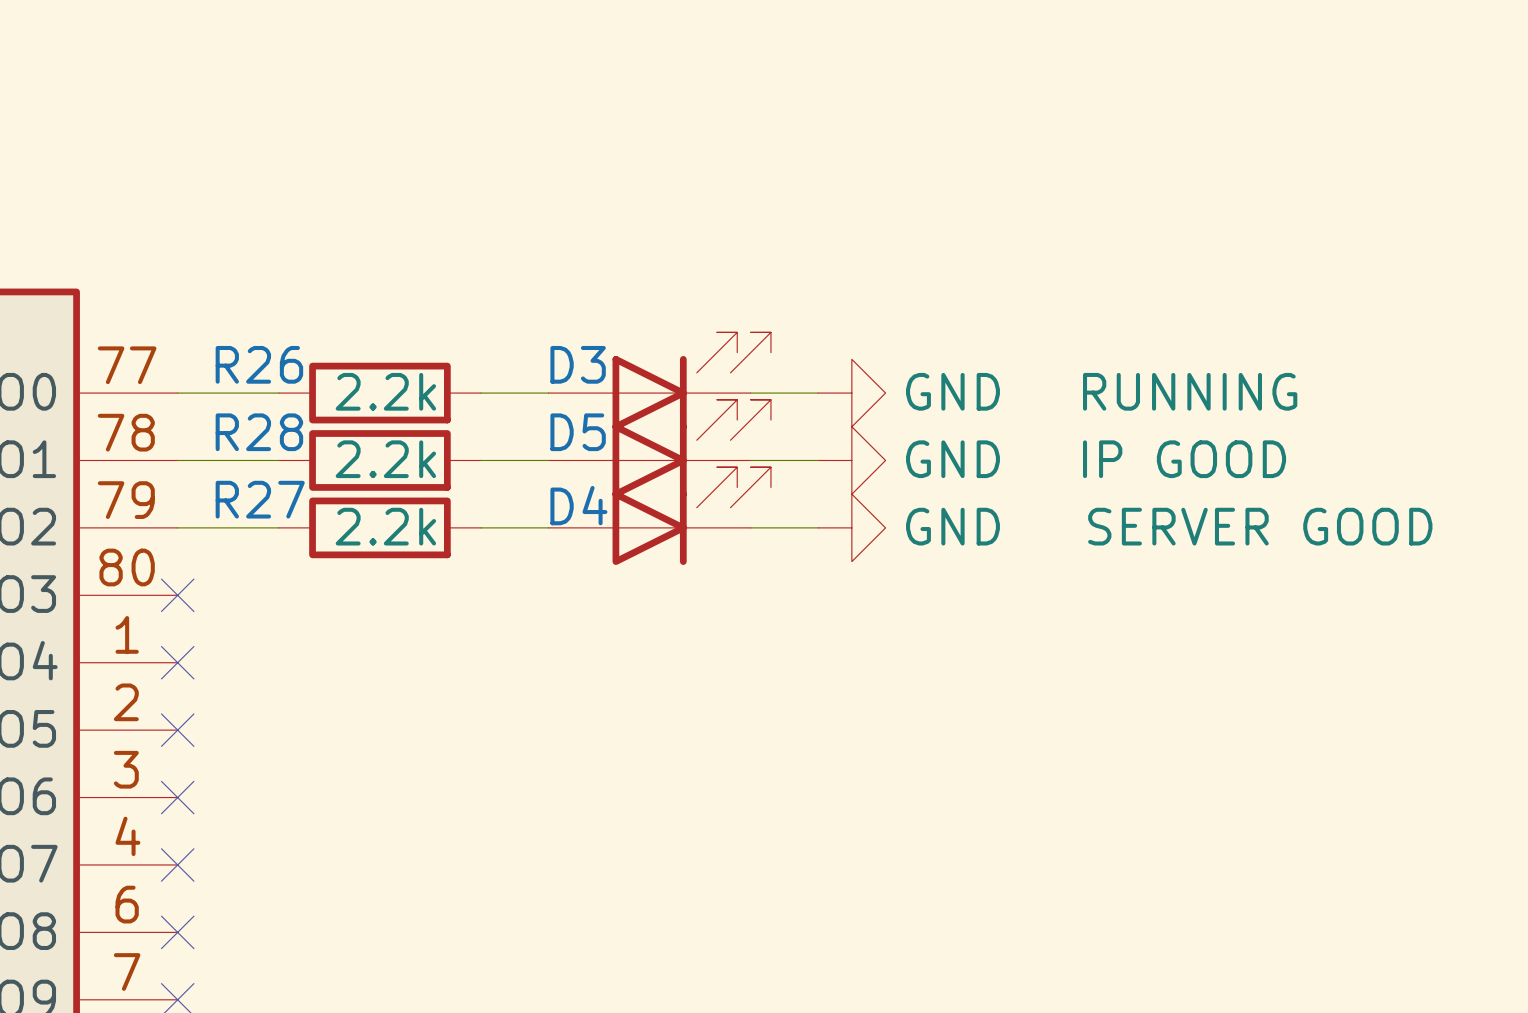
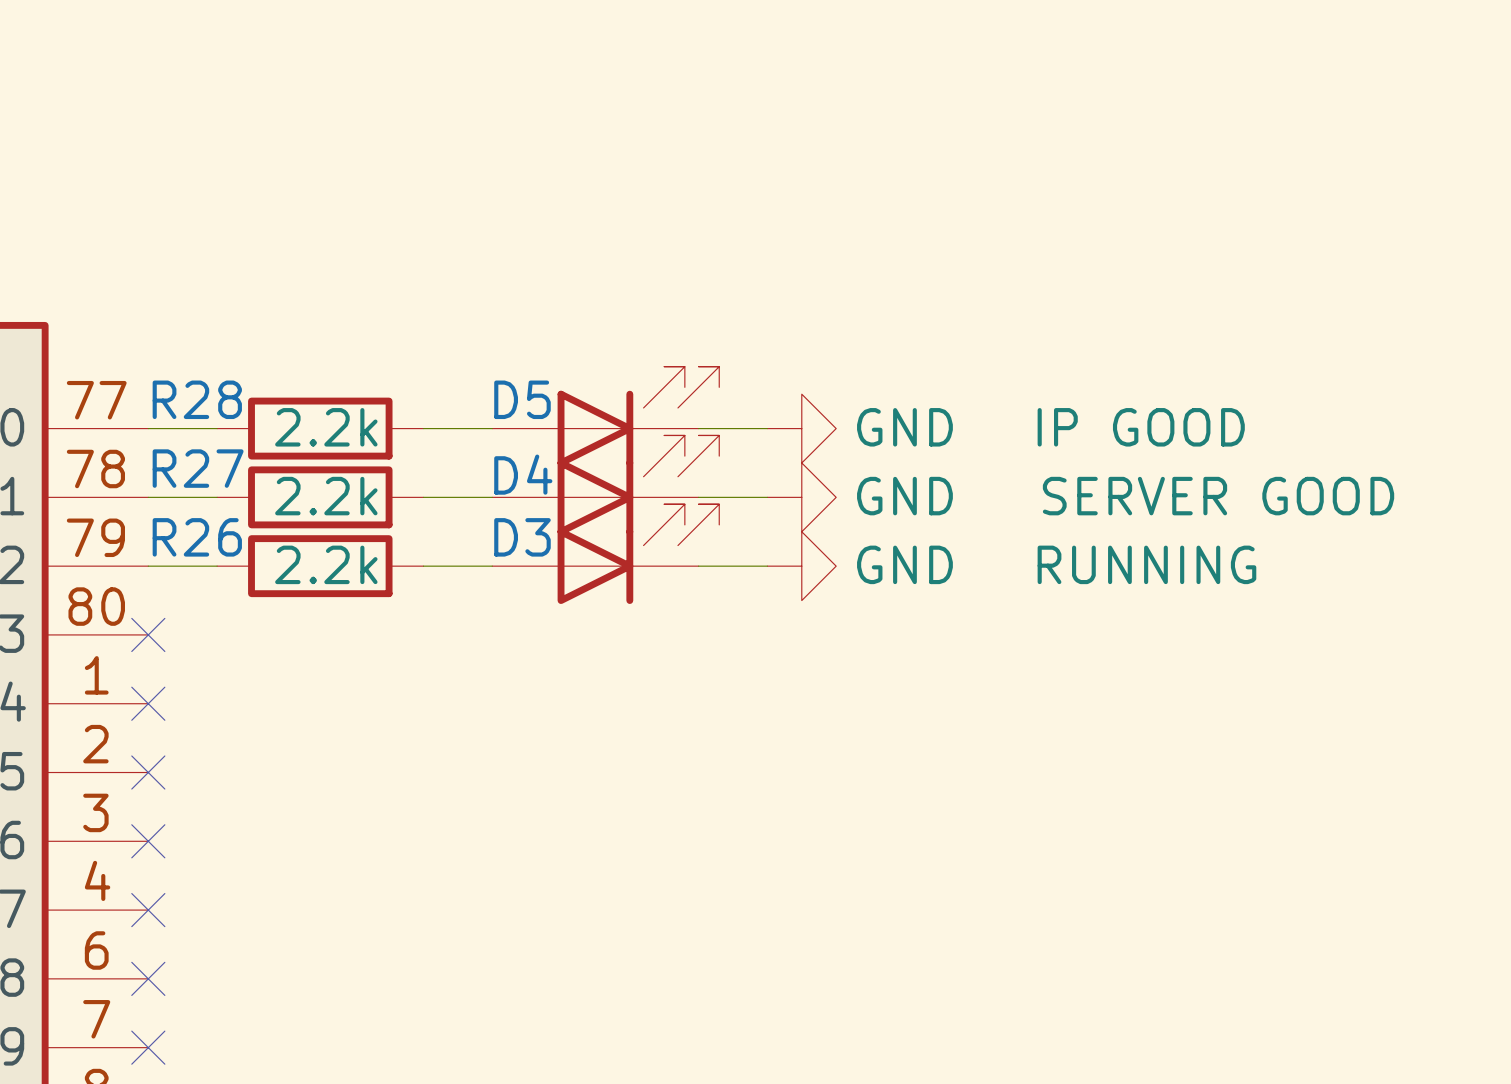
D3 position: (659, 381) -> (605, 554)
R26 position: (379, 393) -> (320, 566)
power symbol position: GND (851, 393) -> GND (801, 428)
D5 position: (659, 448) -> (605, 416)
R28 position: (379, 460) -> (320, 428)
power symbol position: GND (851, 460) -> GND (801, 497)
D4 position: (659, 516) -> (605, 485)
R27 position: (379, 527) -> (320, 497)
power symbol position: GND (851, 527) -> GND (801, 566)

